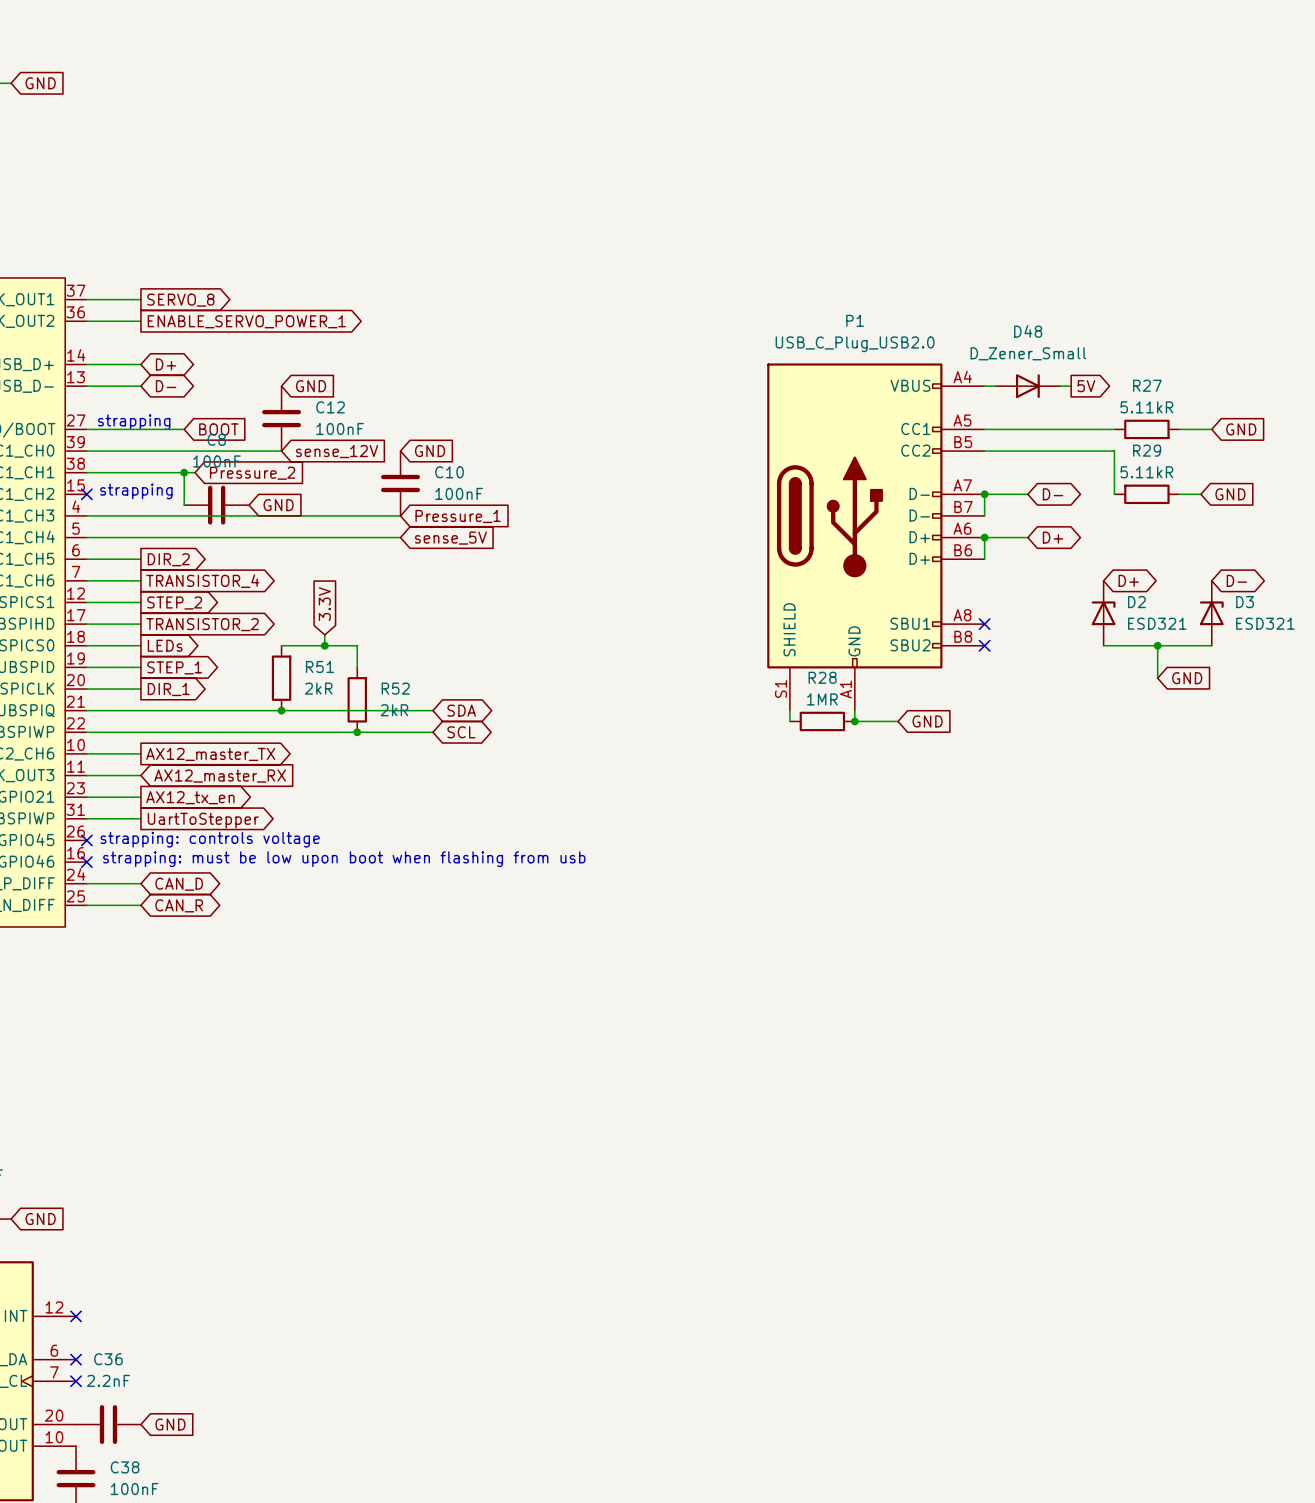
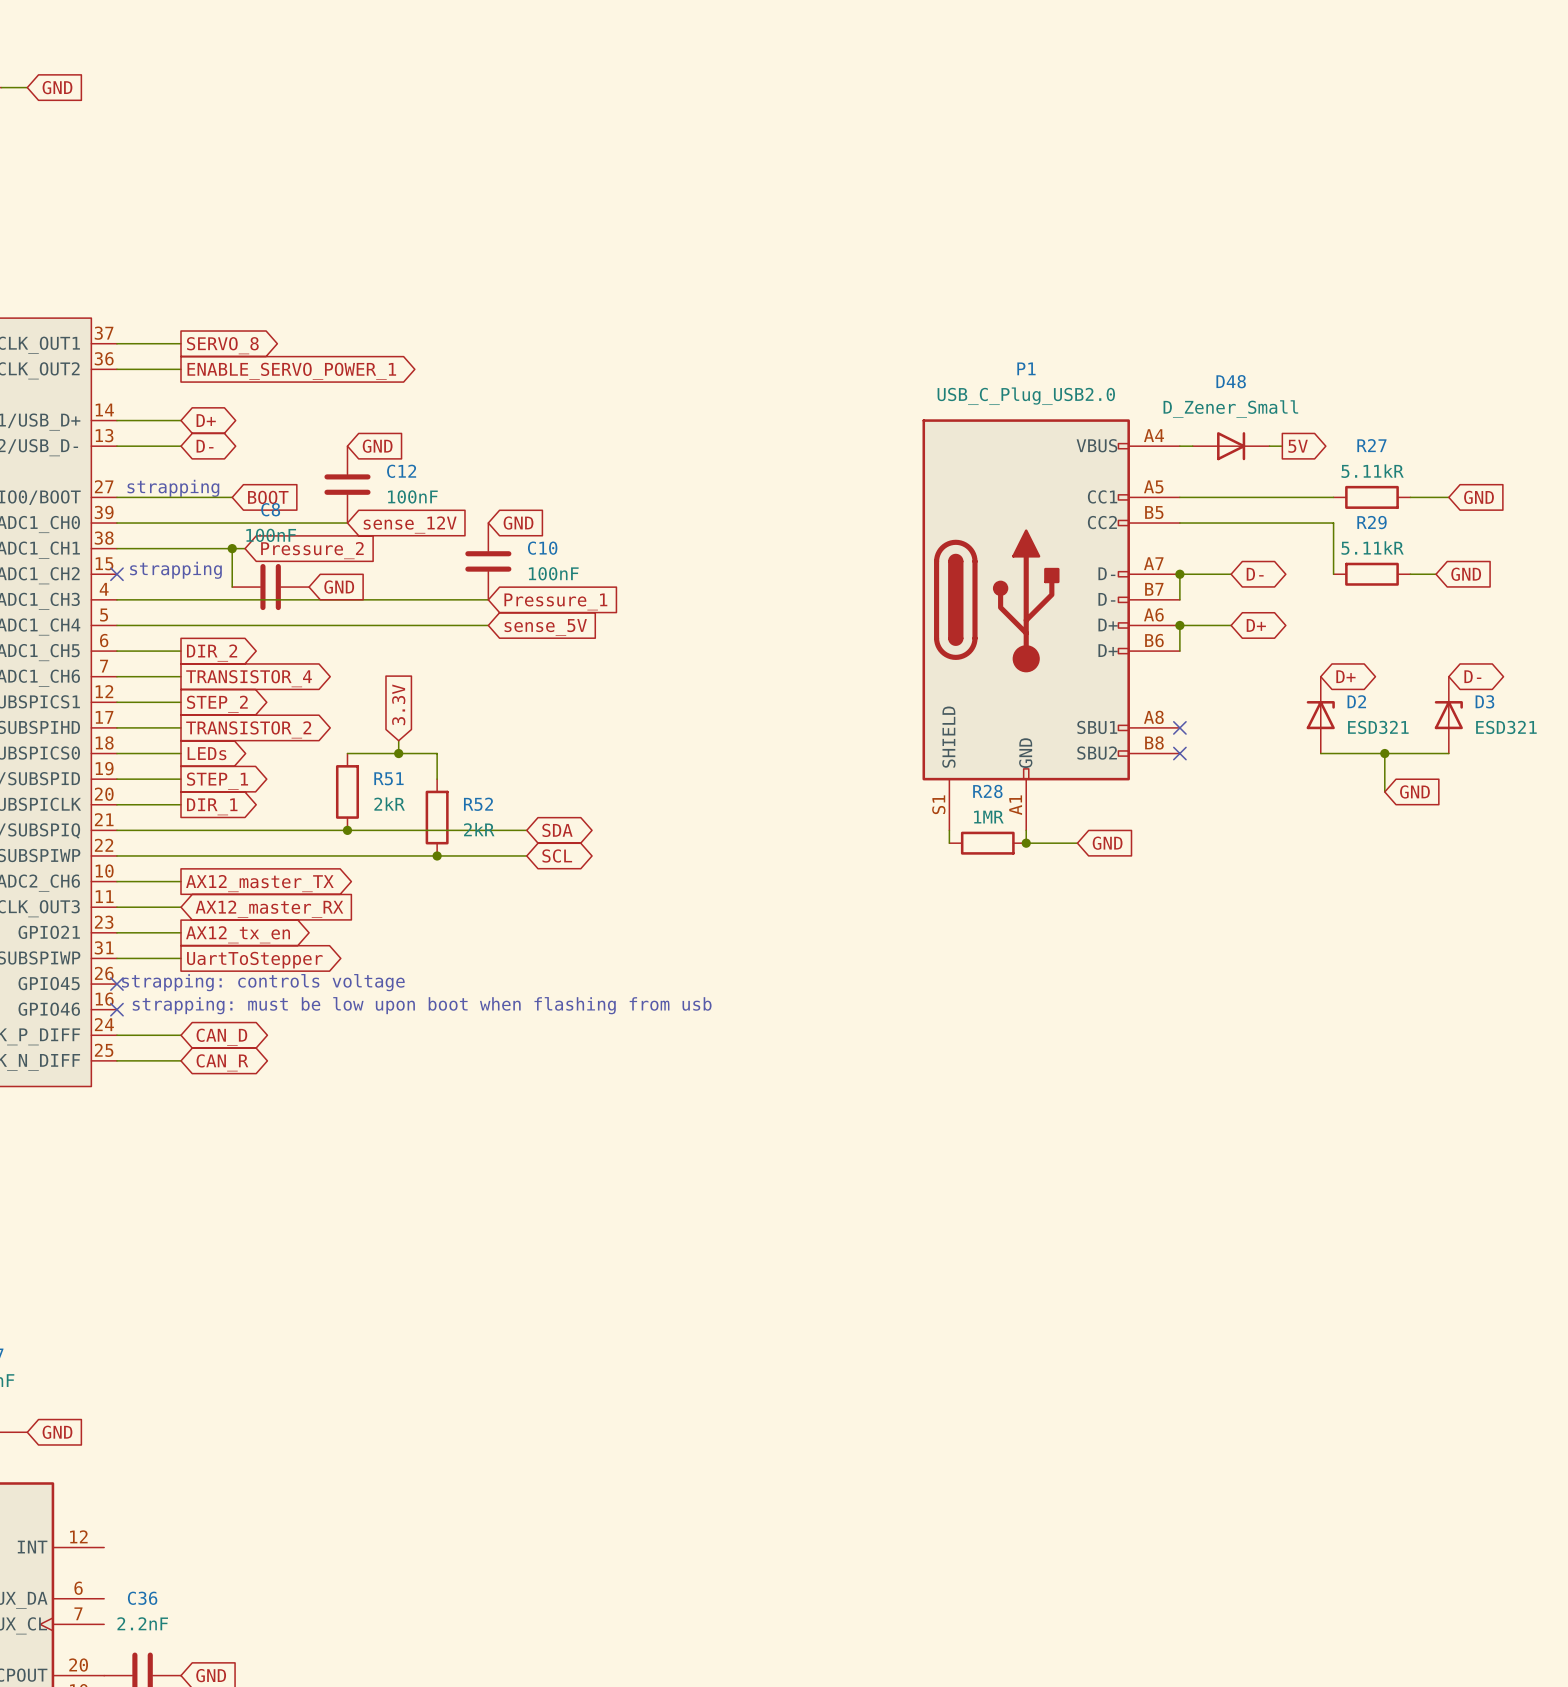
no-connect mark: (76, 1316) -> none
no-connect mark: (76, 1359) -> none
no-connect mark: (76, 1381) -> none

